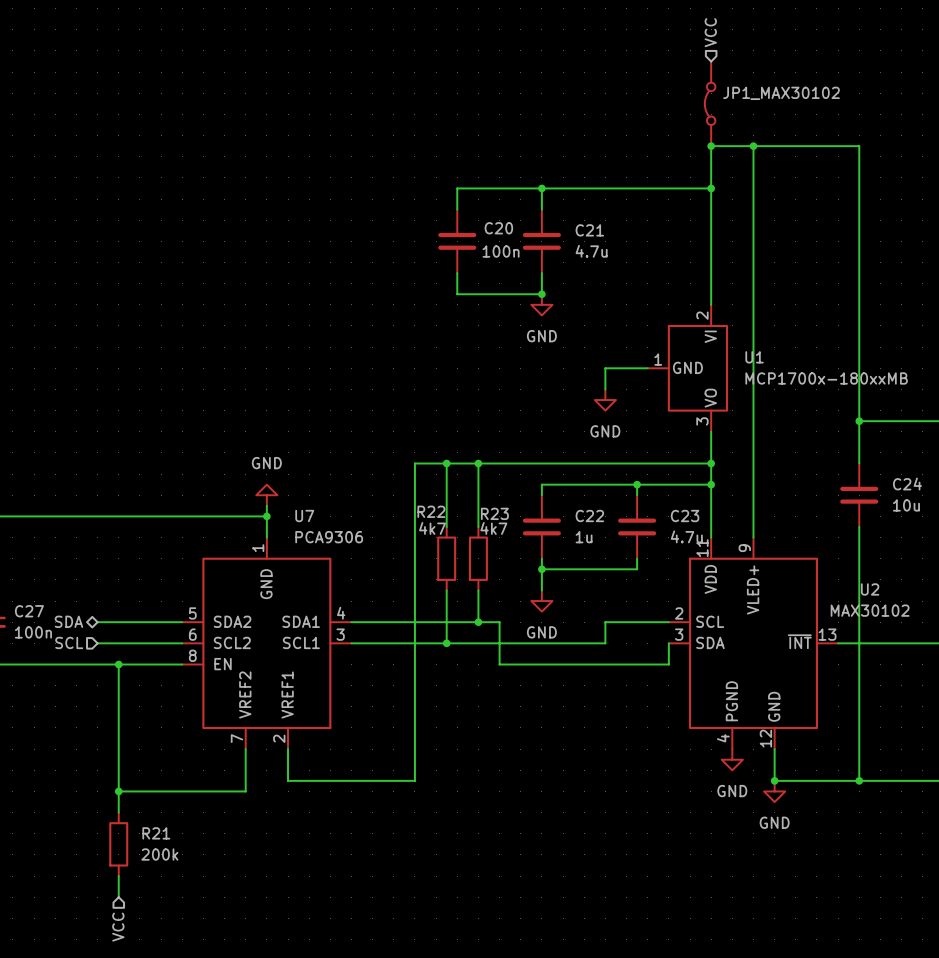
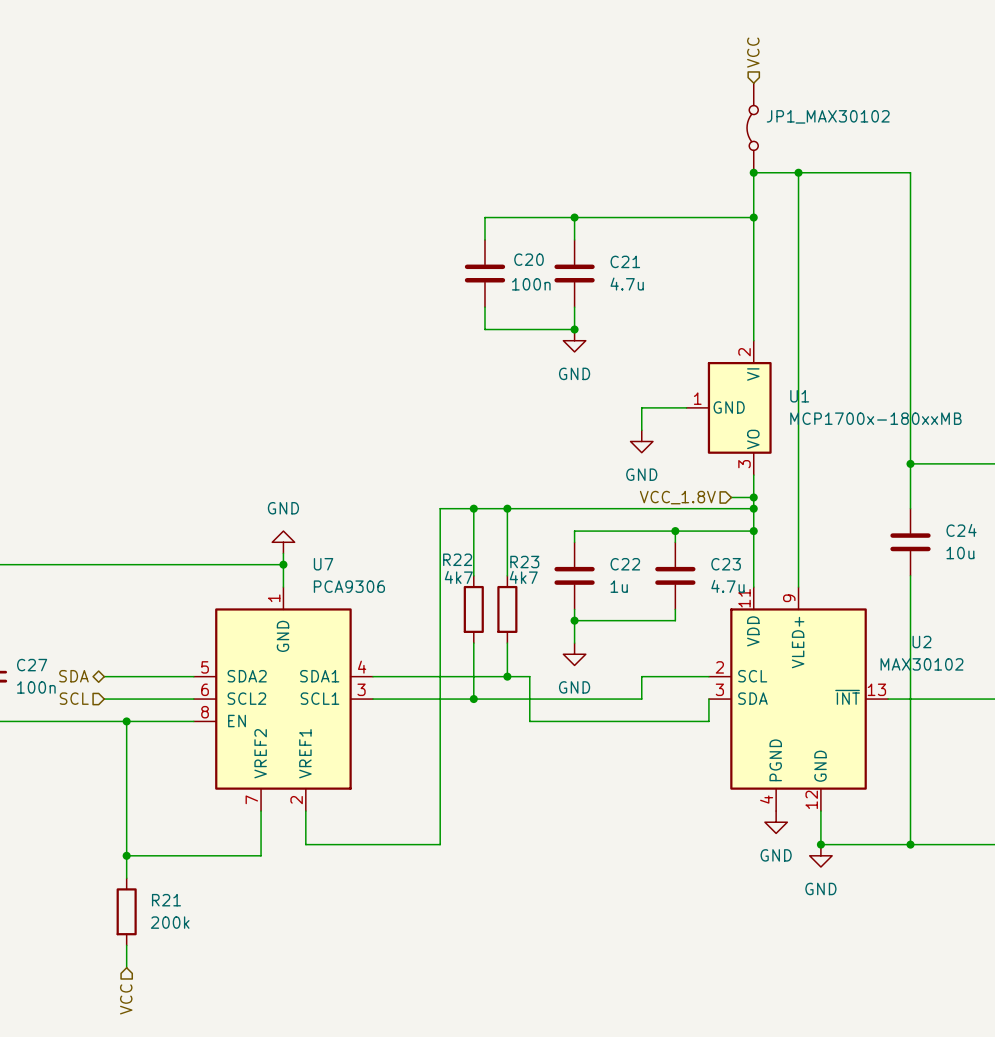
wire: none -> (731, 497) (753, 497)
junction: none -> (753, 497)
hierarchical label: none -> VCC_1.8V (677, 497)

